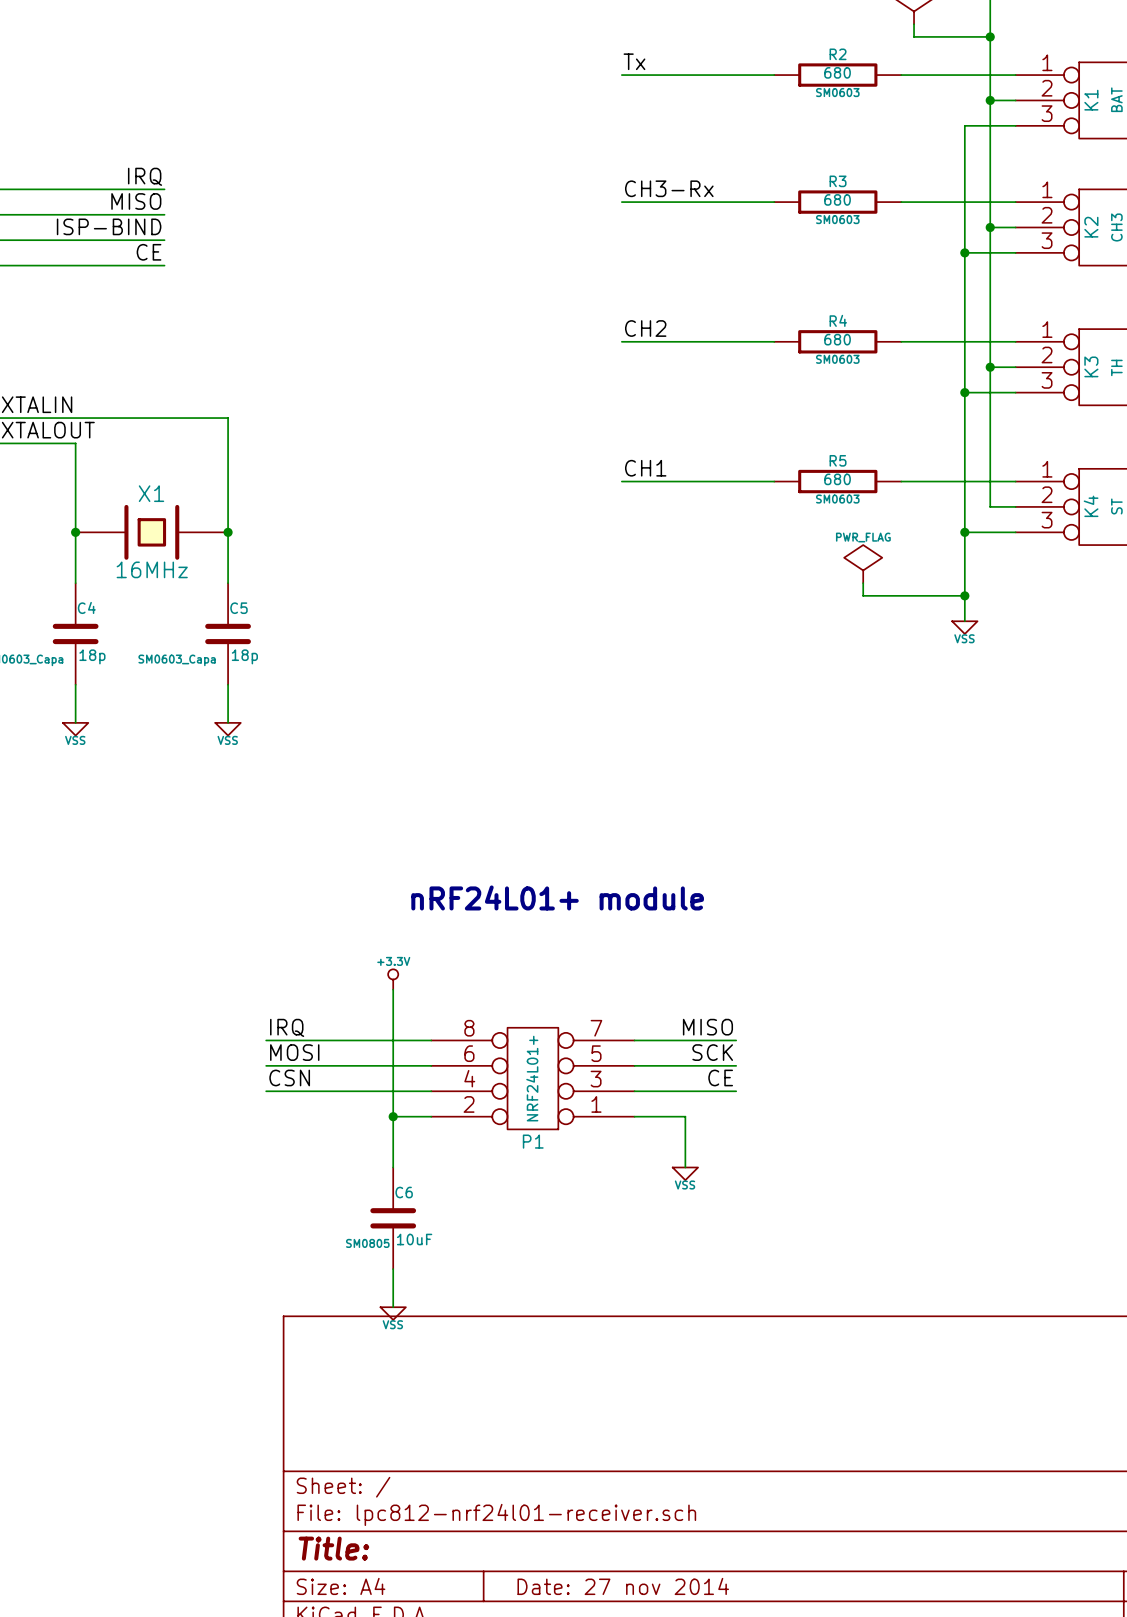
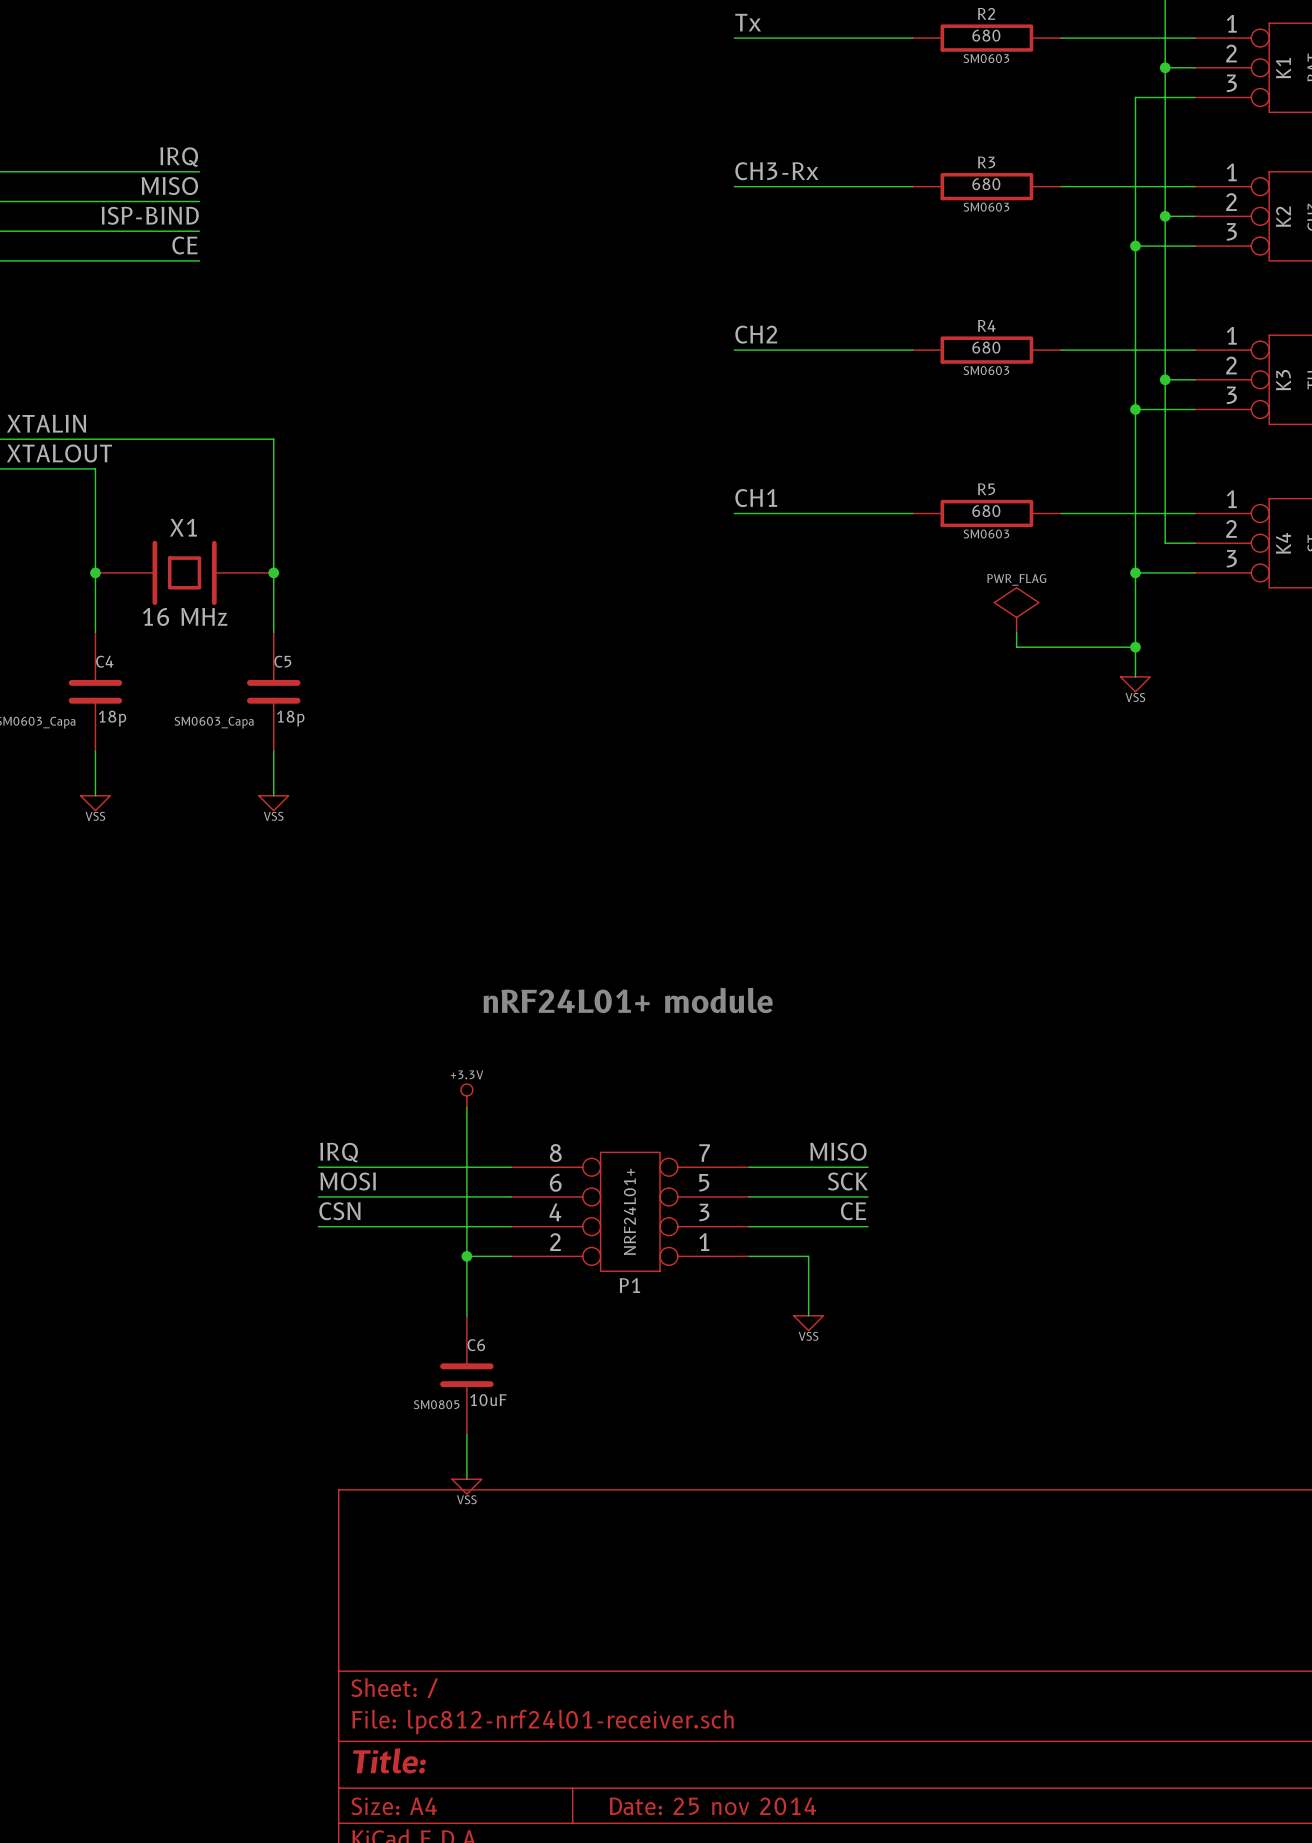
X1 value: 16MHz (152, 569) -> 16 MHz (185, 616)
title block: Date: 27 nov 2014 (623, 1586) -> Date: 25 nov 2014 (712, 1806)

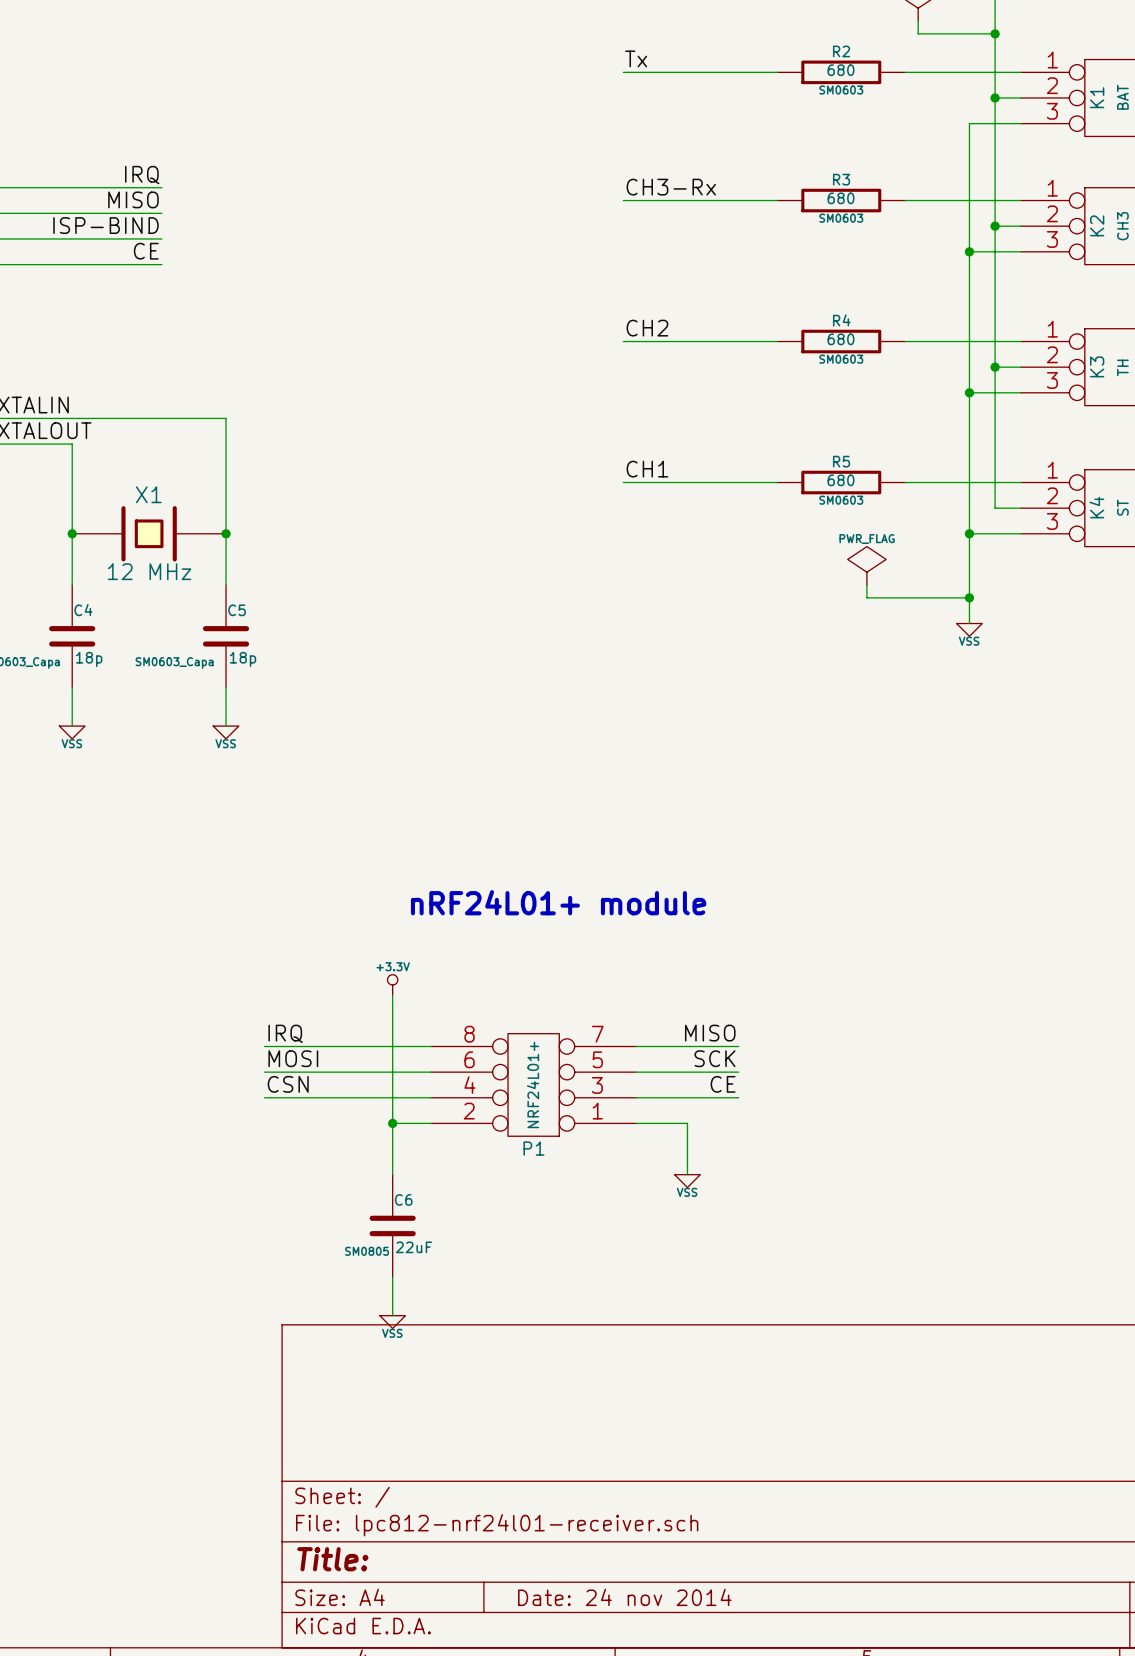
X1 value: 16 MHz (185, 616) -> 12 MHz (149, 571)
C6 value: 10uF (488, 1400) -> 22uF (414, 1247)
title block: Date: 25 nov 2014 (712, 1806) -> Date: 24 nov 2014 (624, 1597)

